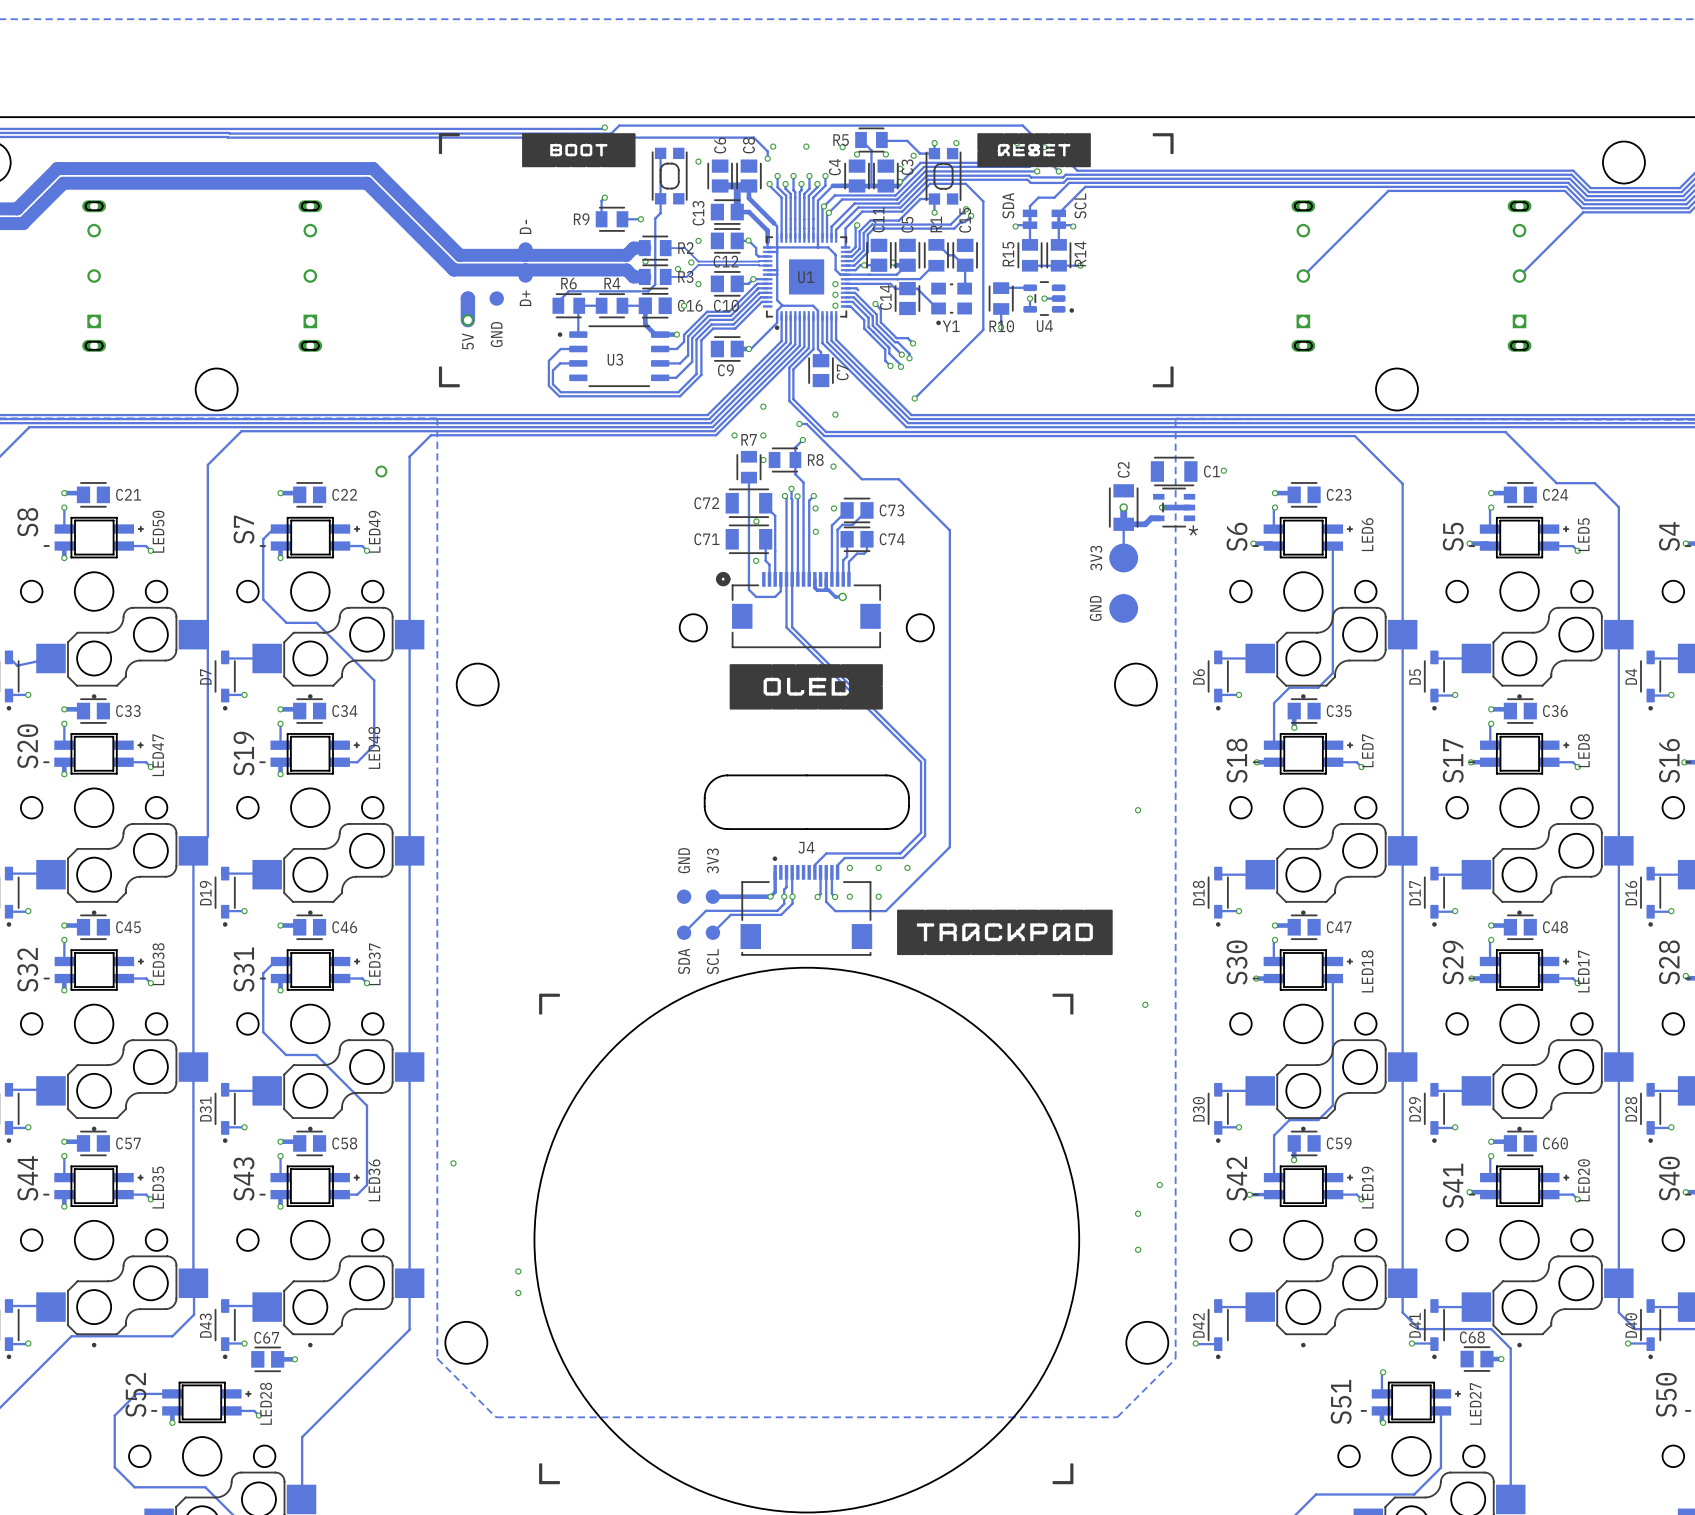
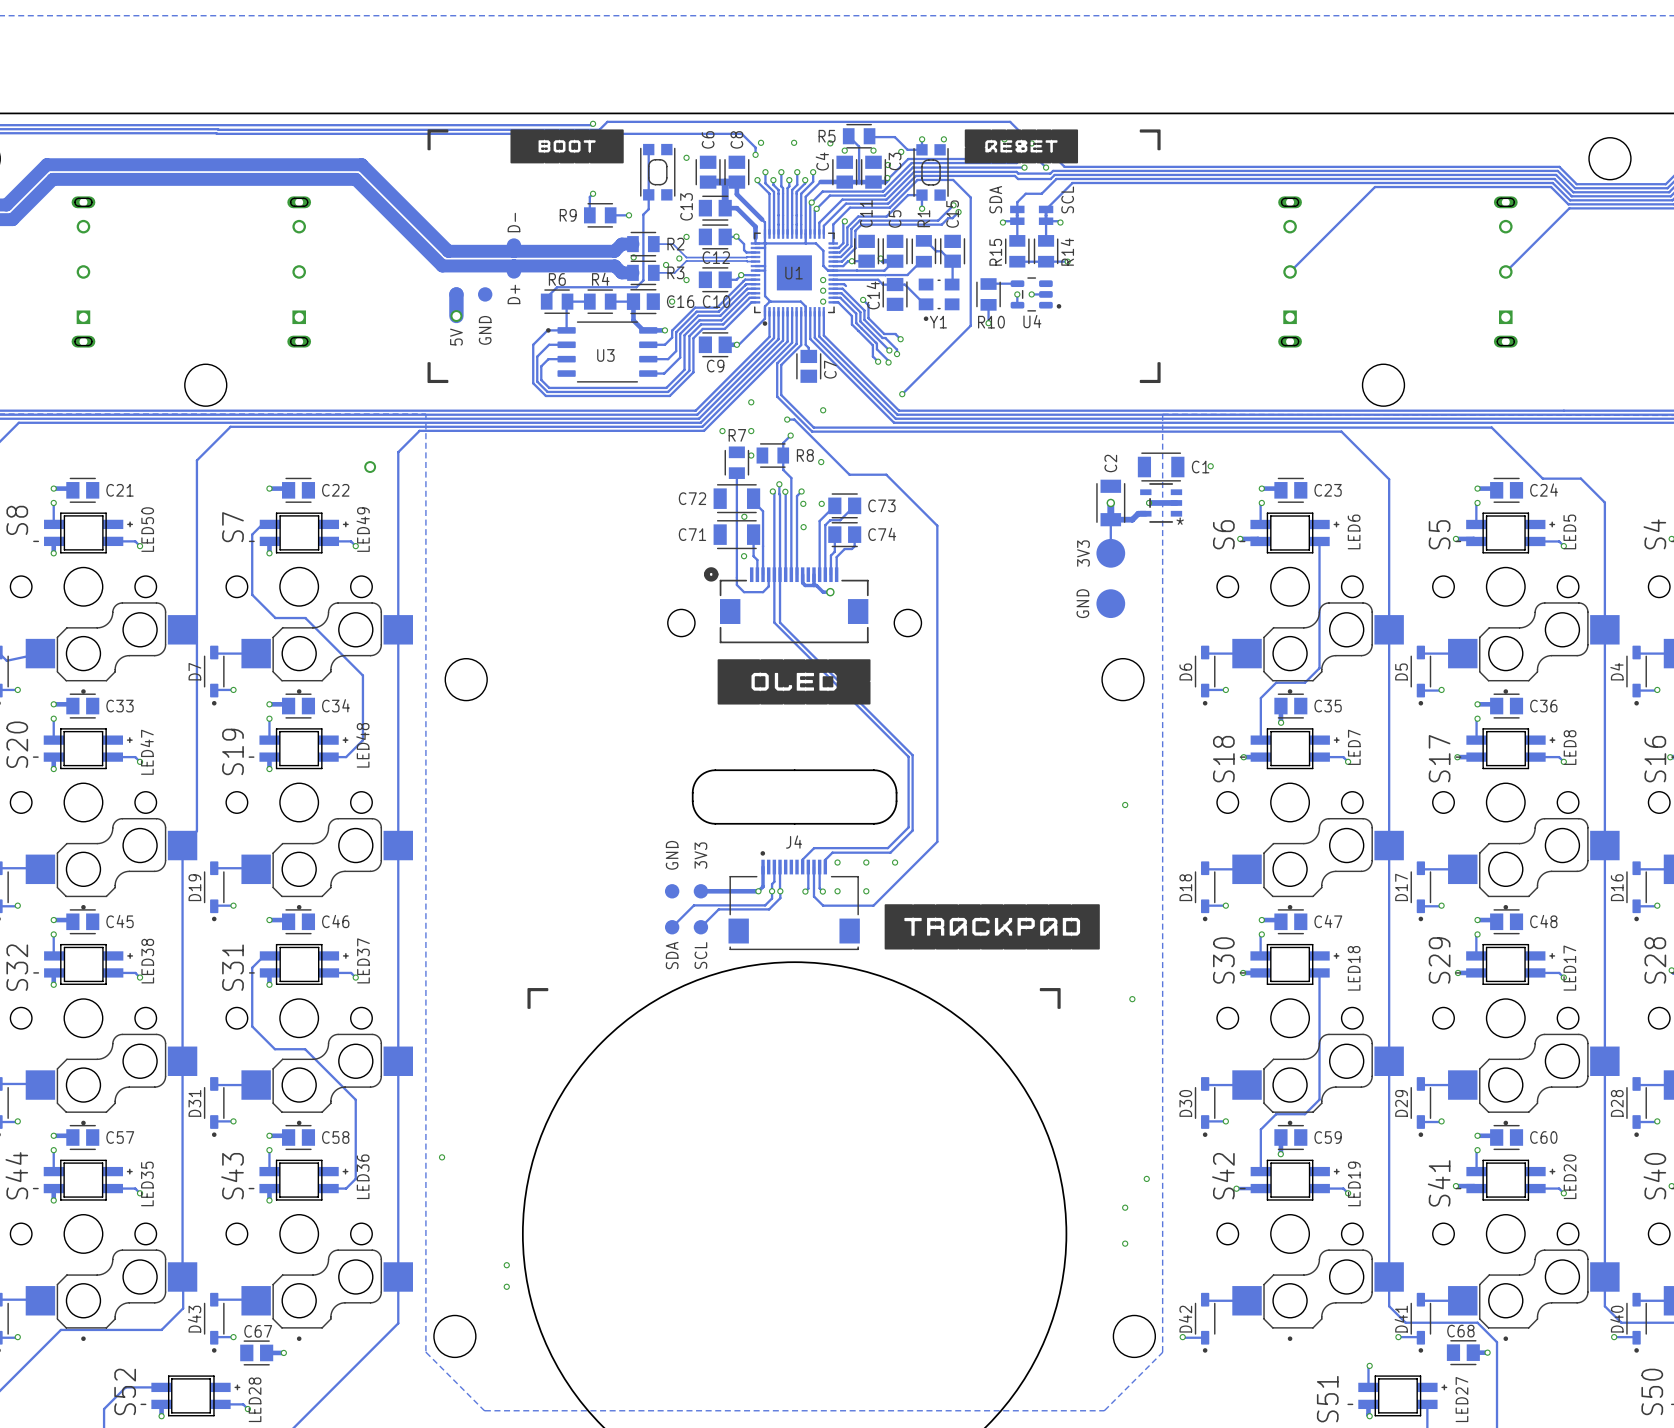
track: none -> (755, 302) (751, 302) (724, 328) (702, 328) (693, 338) (693, 372) (669, 395) (545, 395) (533, 383) (533, 344) (547, 330) (566, 330)

